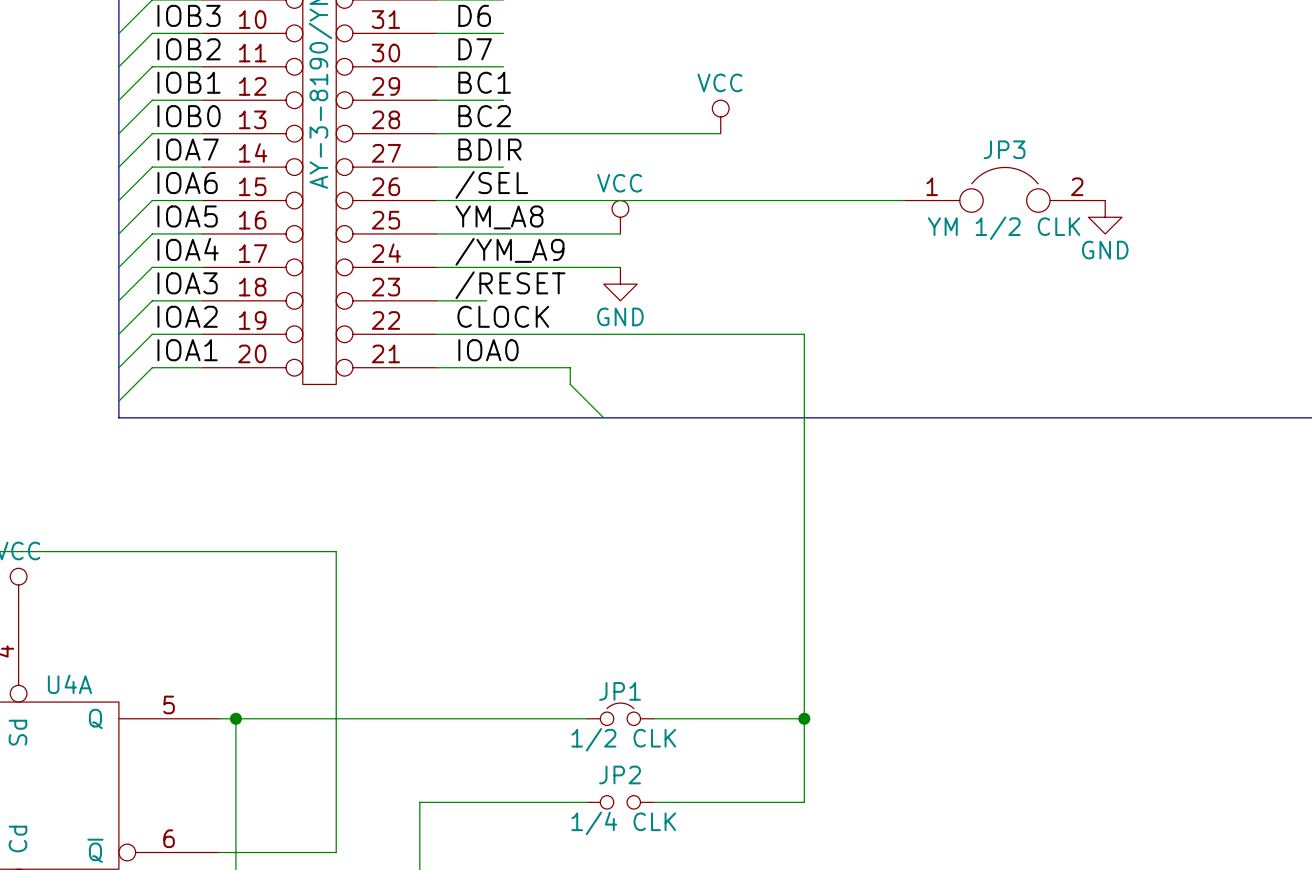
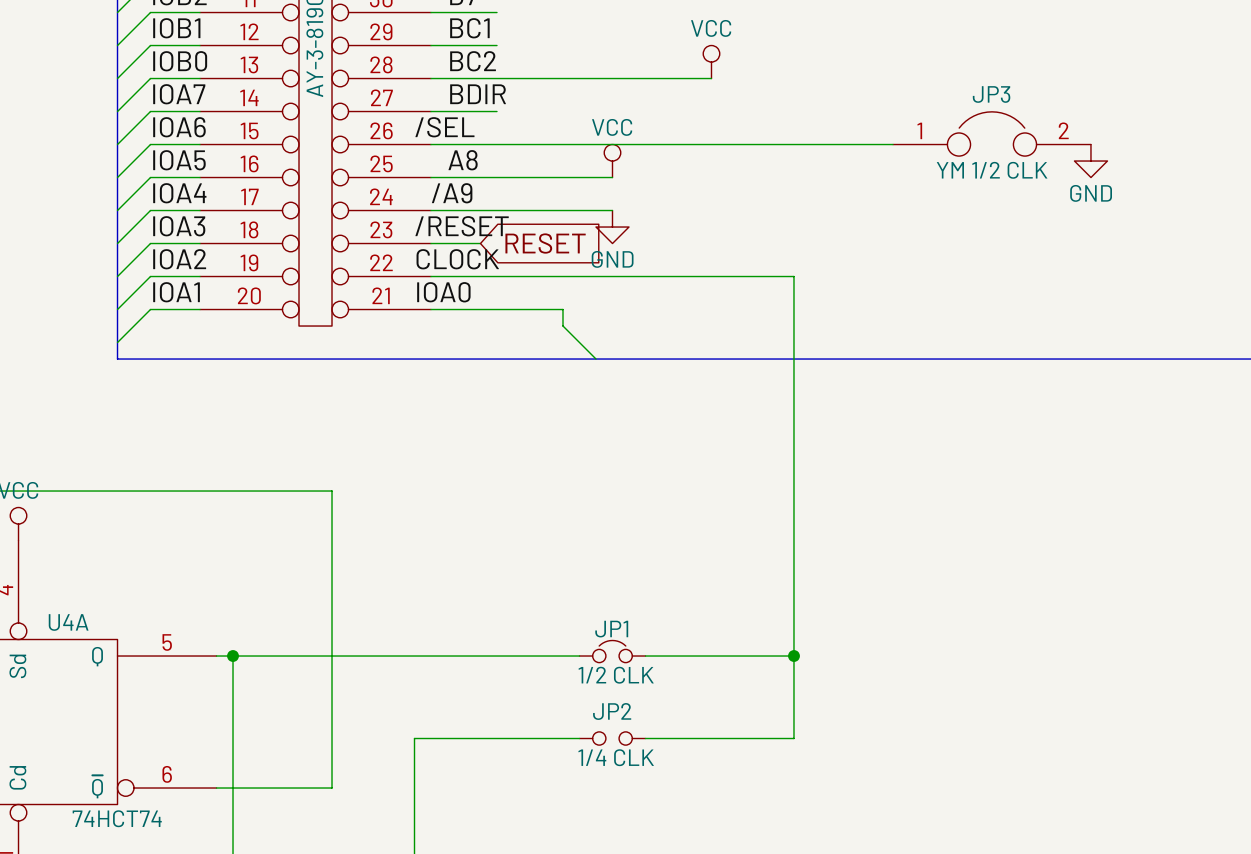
label position: /SEL (491, 184) -> /SEL (444, 127)
label: YM_A8 (499, 217) -> A8 (463, 160)
label: /YM_A9 (509, 251) -> /A9 (452, 193)
label position: /RESET (510, 285) -> /RESET (462, 226)
global label: none -> RESET (545, 243)
label position: CLOCK (503, 316) -> CLOCK (457, 259)
label position: IOA0 (488, 350) -> IOA0 (443, 292)

